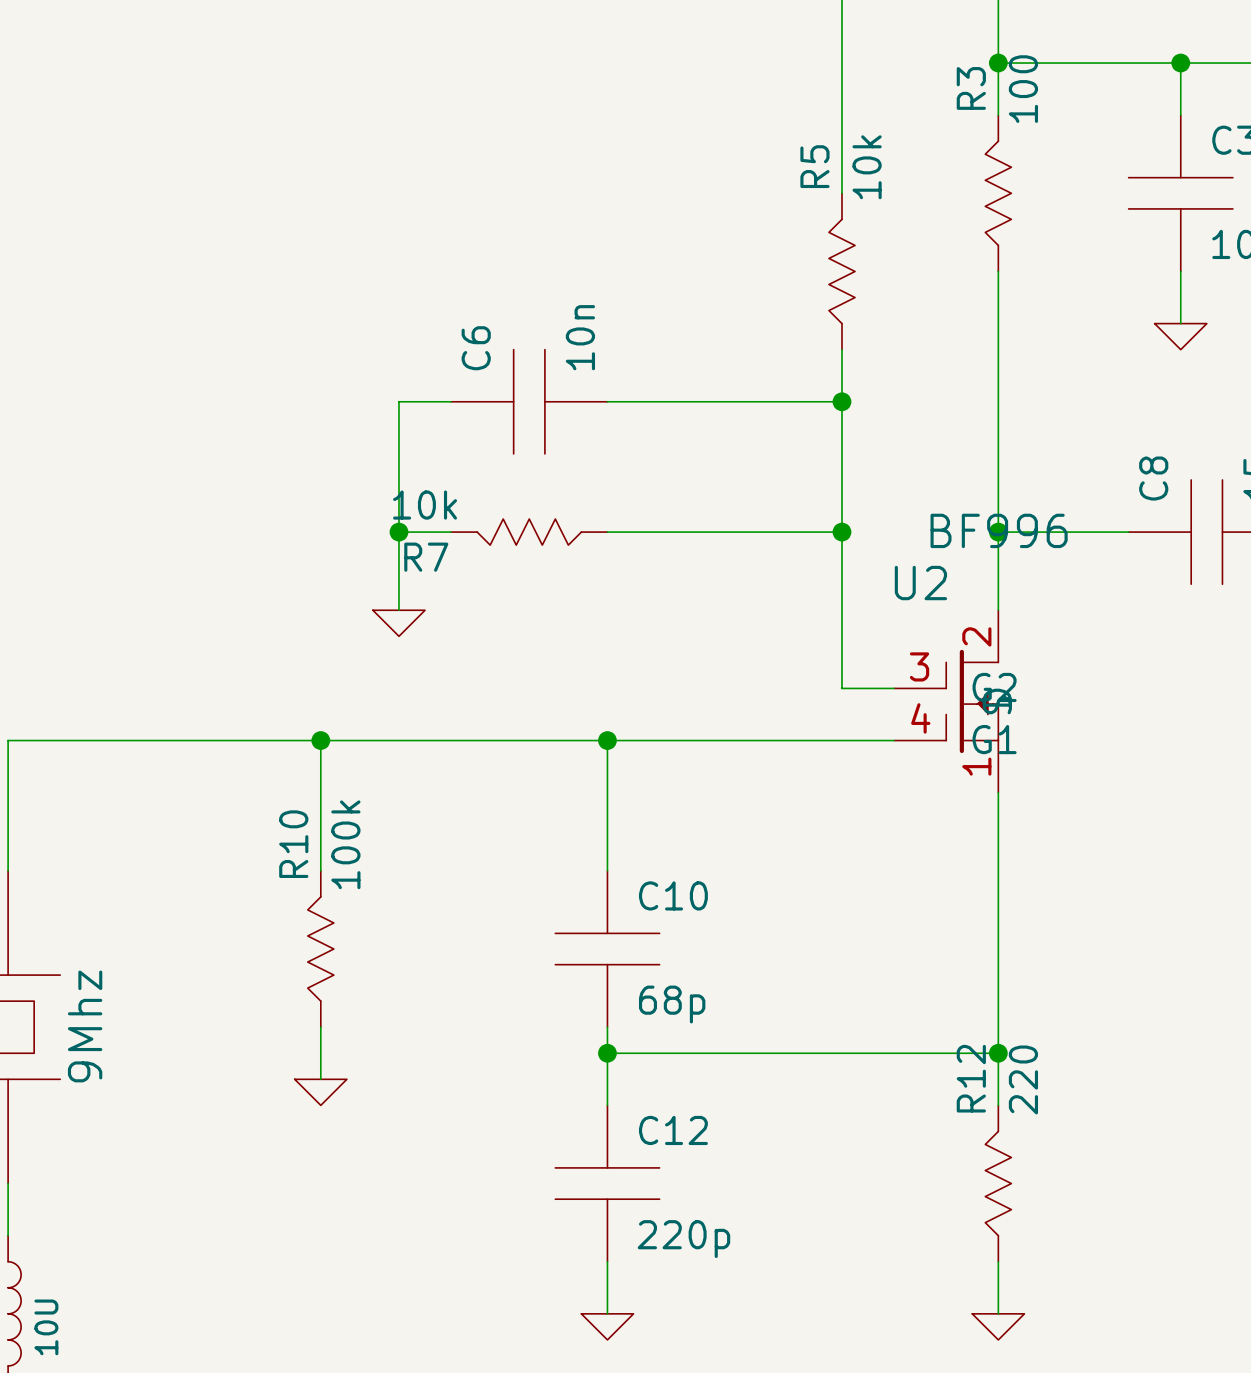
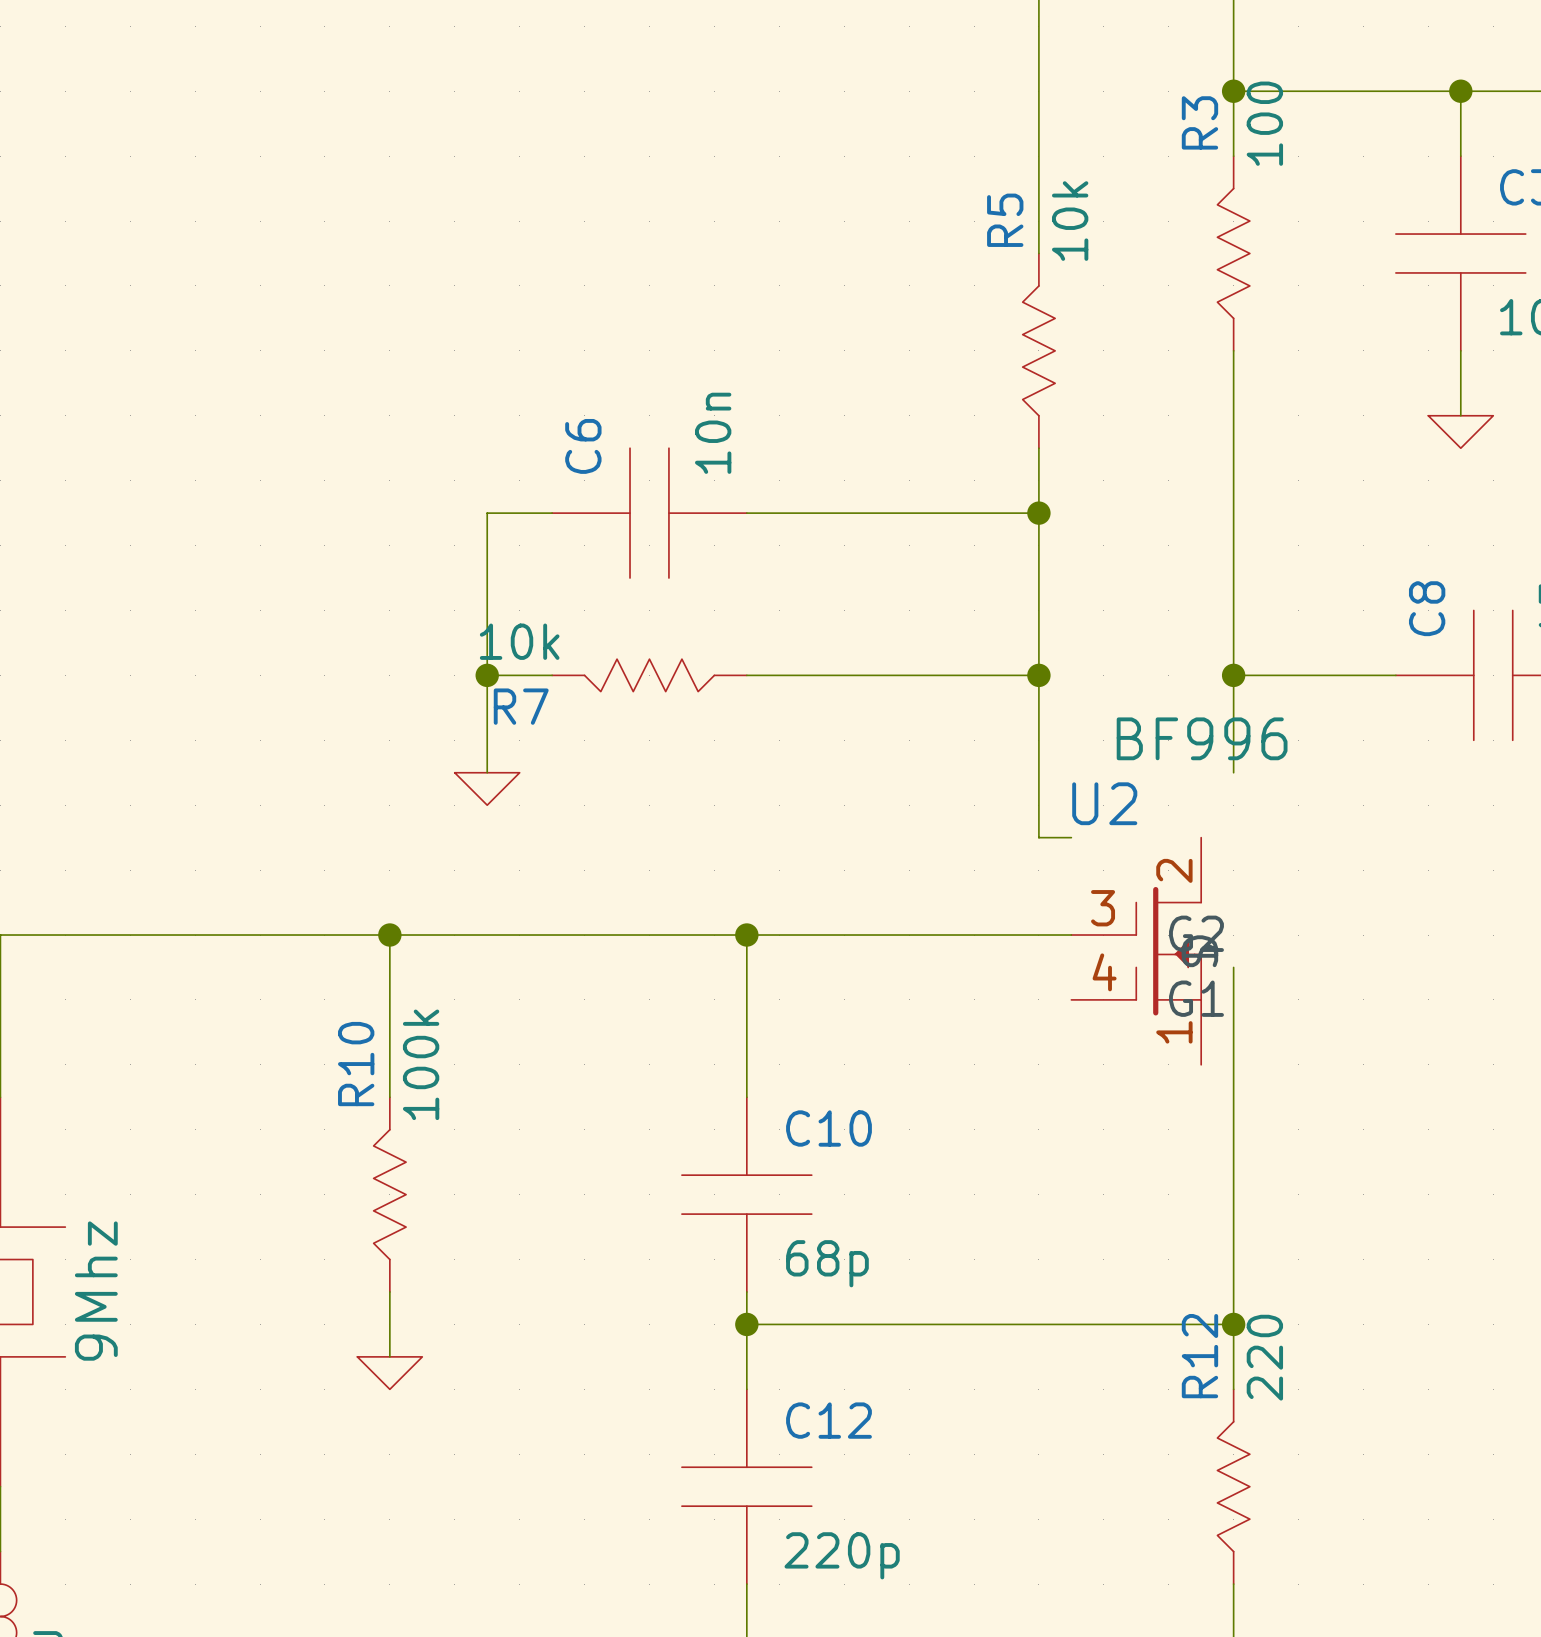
wire: (841, 662) (841, 688) (894, 688) -> (1038, 837) (1071, 837)
U2 position: (946, 701) -> (1136, 951)

